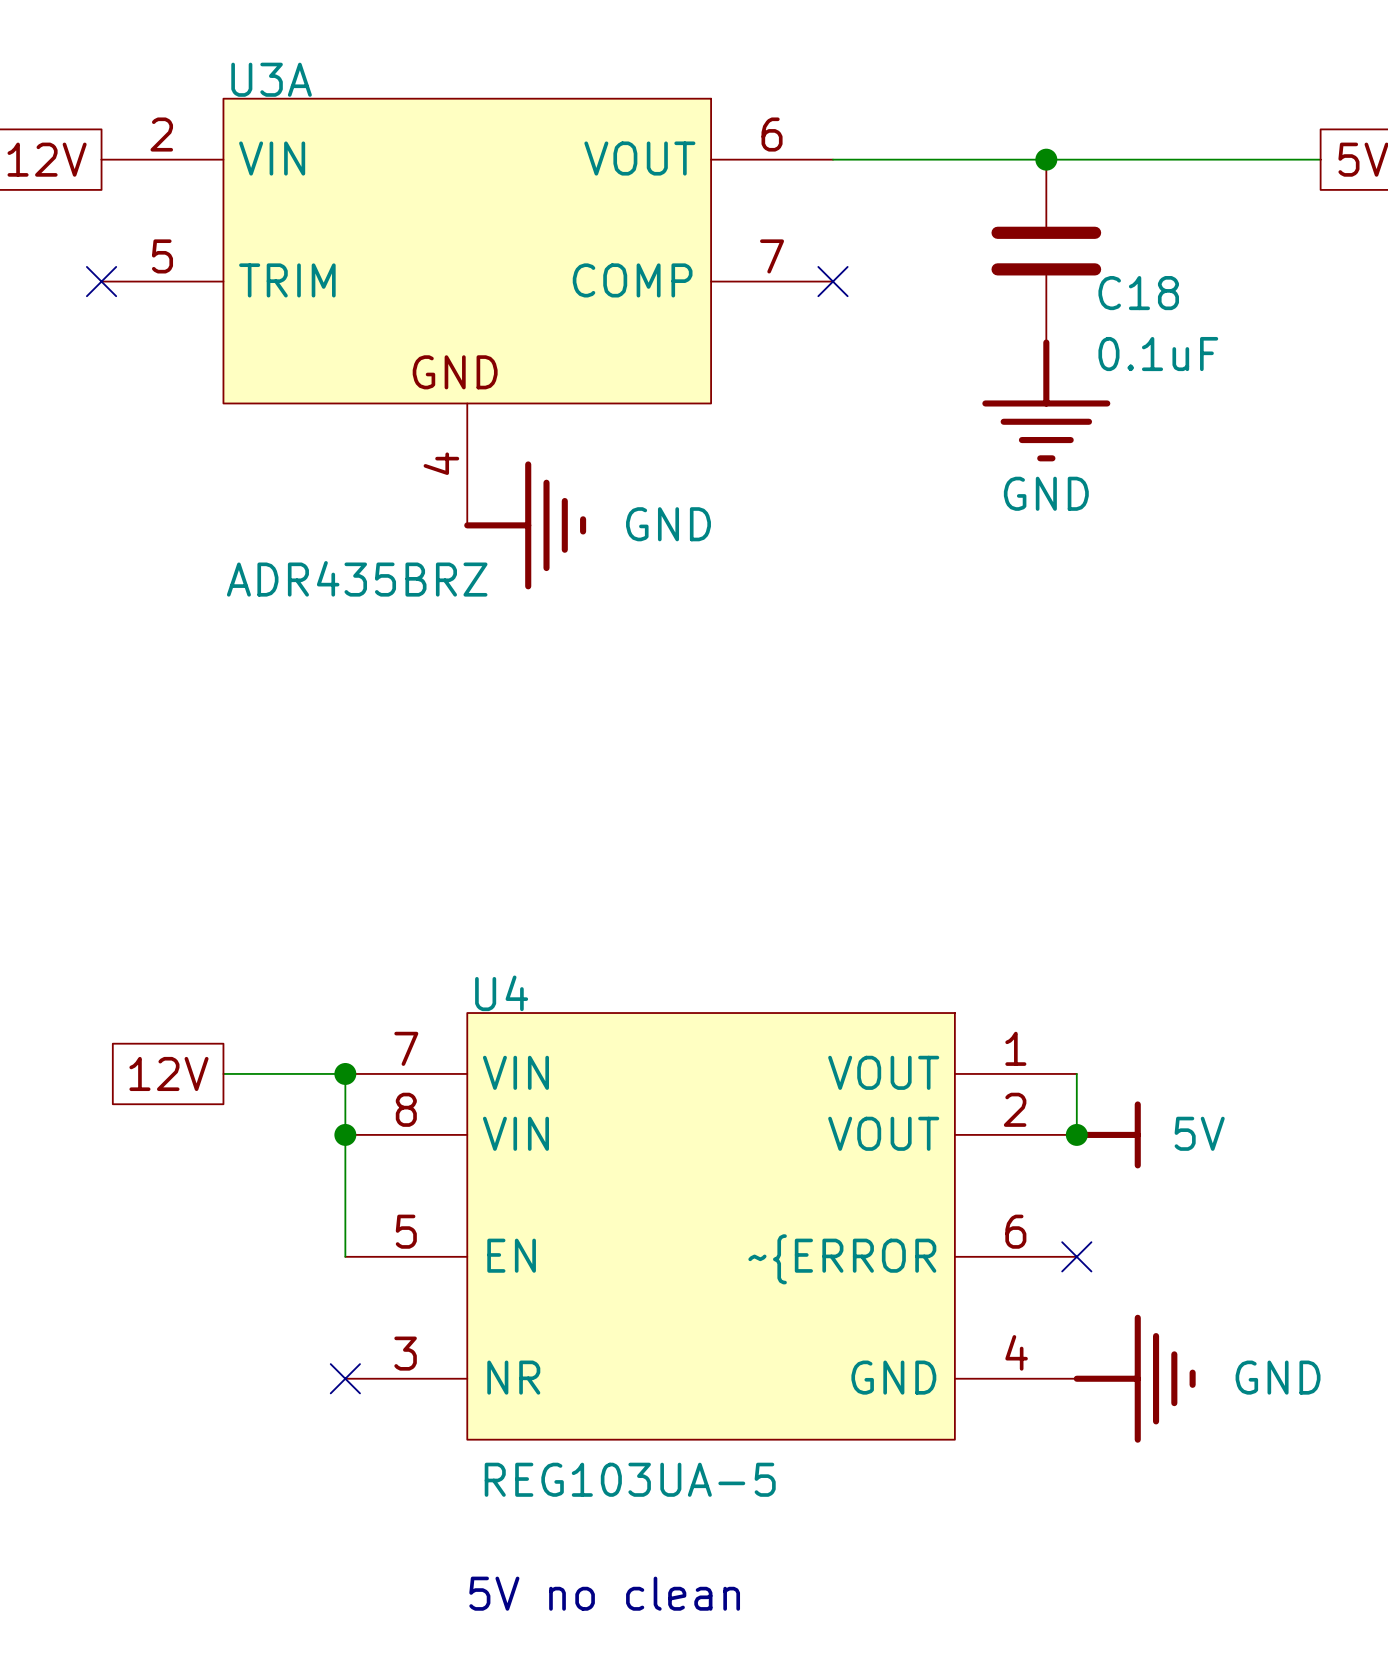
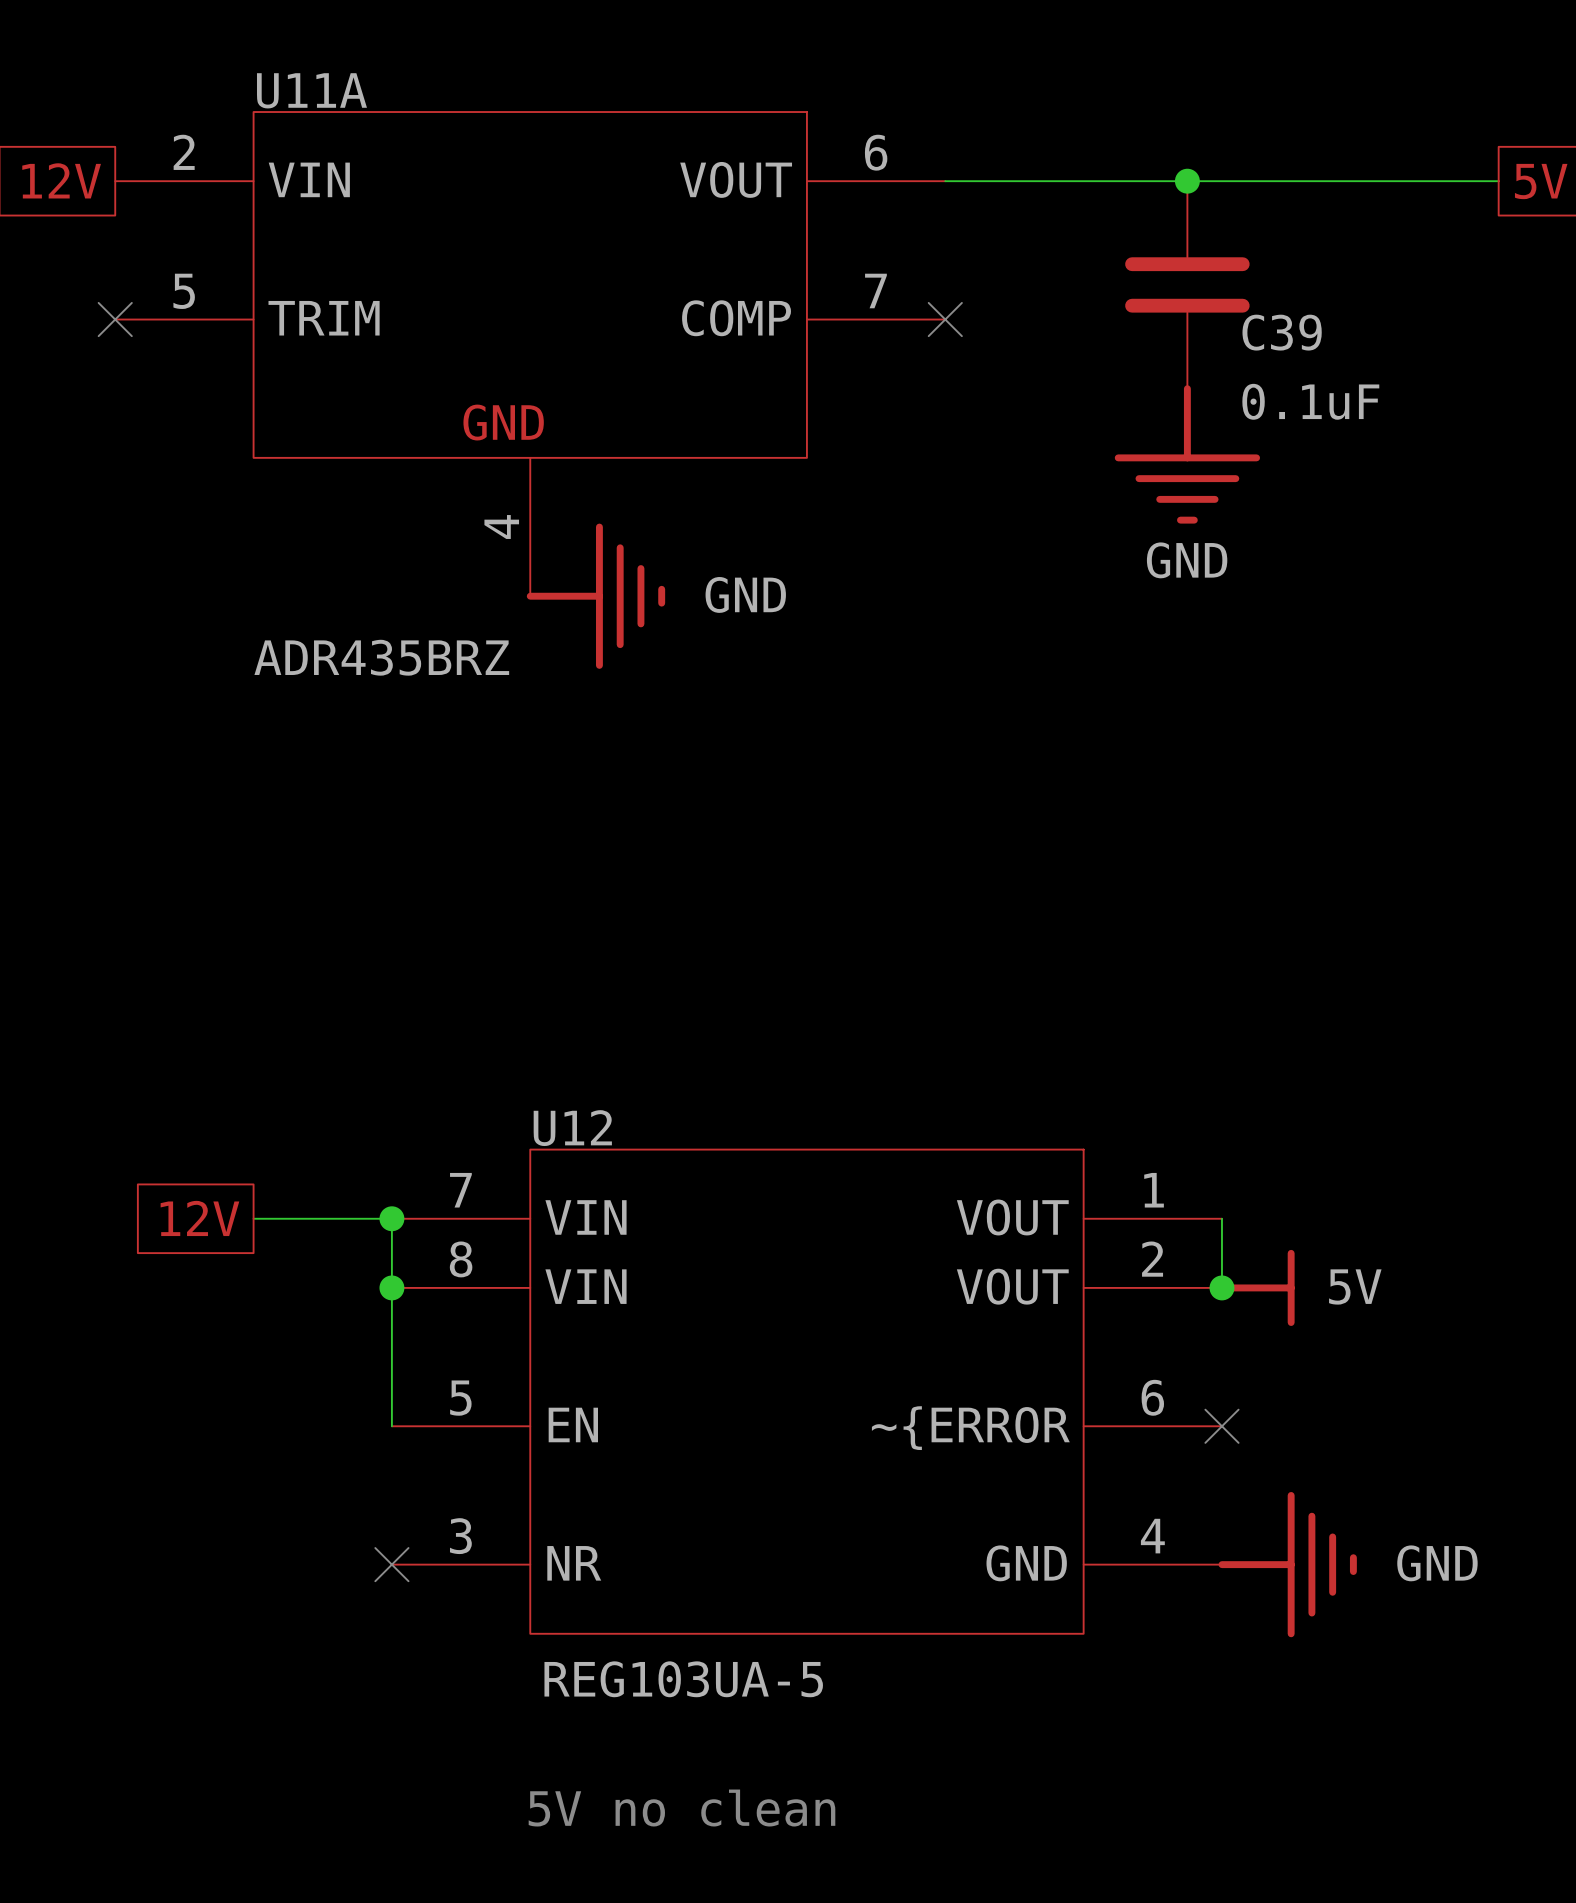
U3A name: U3A (271, 79) -> U11A (311, 90)
C18 name: C18 (1138, 293) -> C39 (1282, 332)
U4 name: U4 (501, 993) -> U12 (572, 1128)

